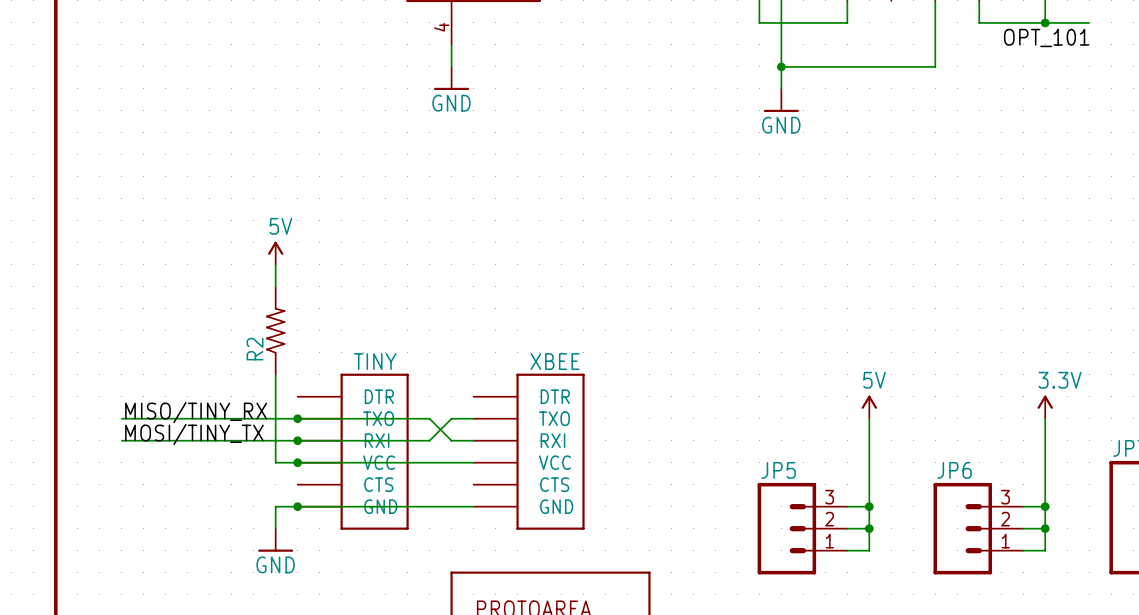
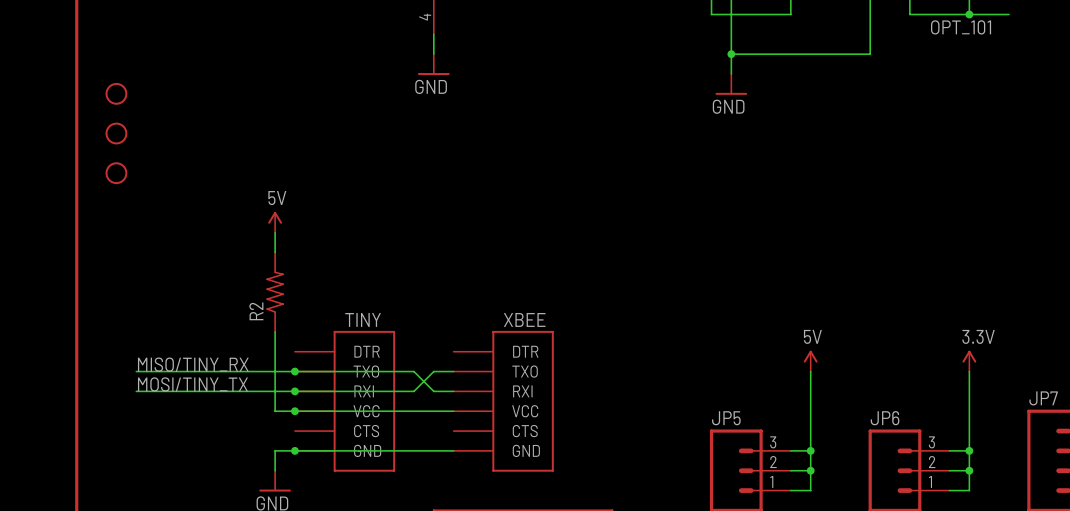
part: none -> (116, 93)
part: none -> (116, 133)
part: none -> (116, 173)

